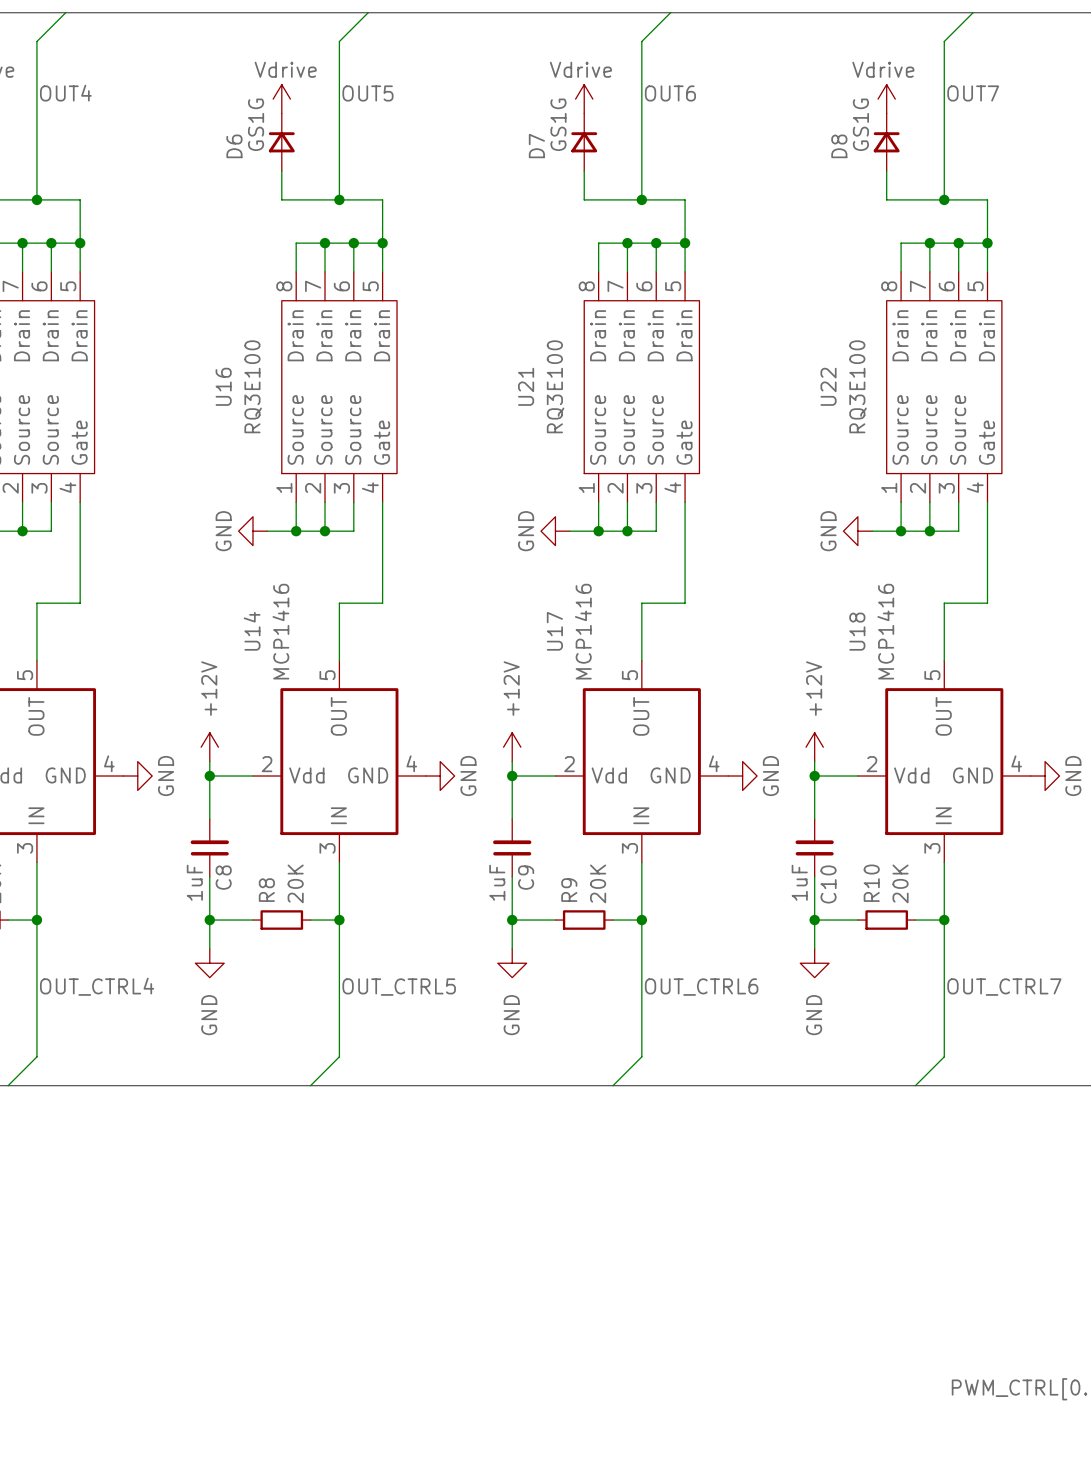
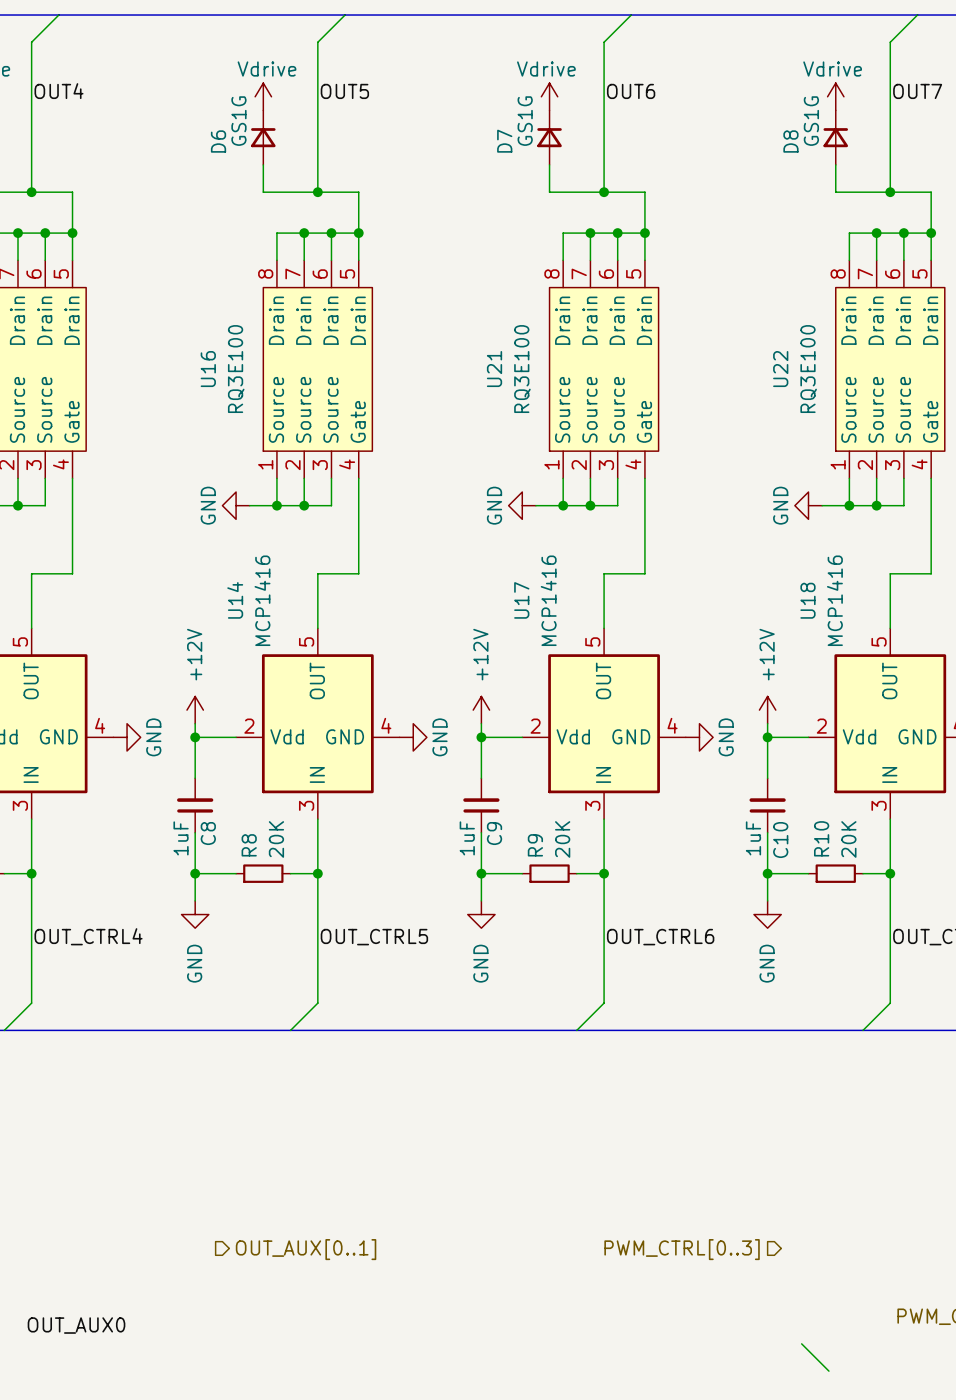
hierarchical label: none -> OUT_AUX[0..1] (306, 1249)
hierarchical label: none -> PWM_CTRL[0..3] (682, 1249)
label: none -> OUT_AUX0 (76, 1325)
wire: none -> (801, 1343) (828, 1371)

